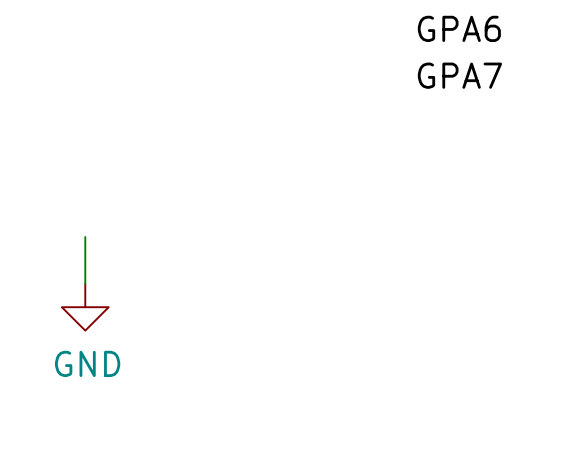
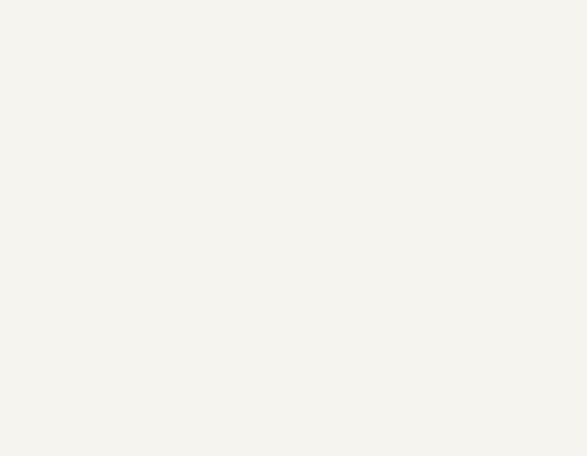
label: GPA6 (459, 28) -> none
label: GPA7 (459, 75) -> none
wire: (85, 236) (85, 283) -> none
power symbol: GND (85, 307) -> none

